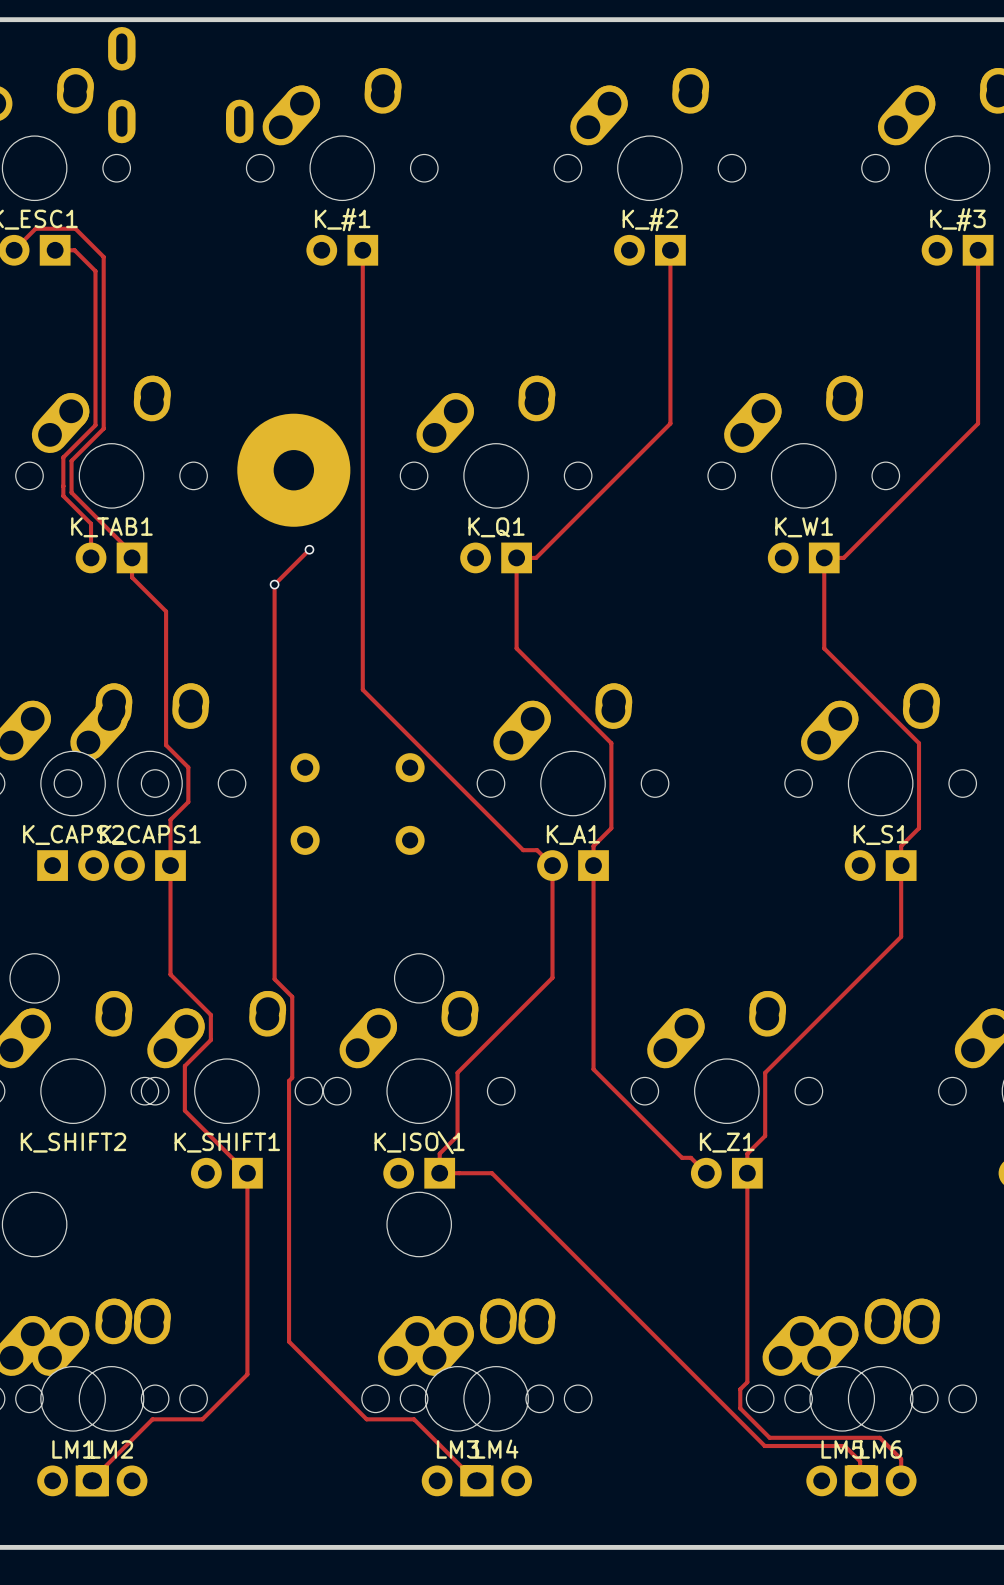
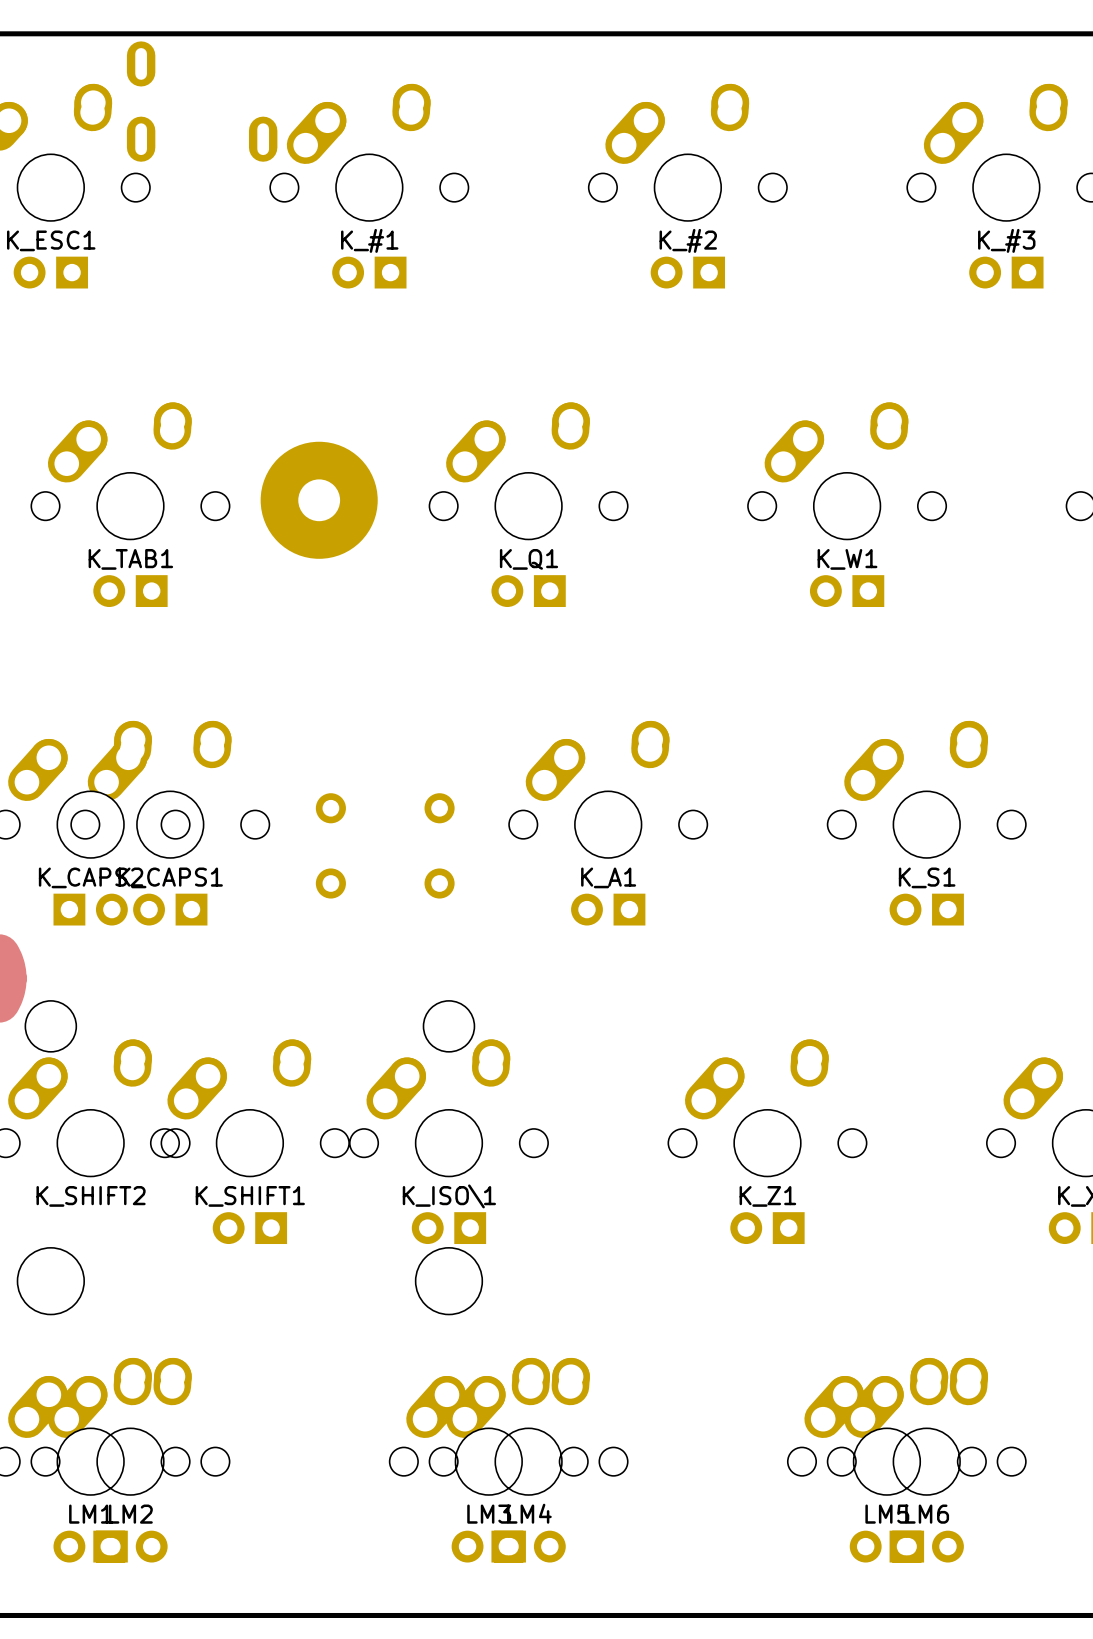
track: (14, 250) (35, 228) (75, 228) (103, 256) (103, 428) (71, 460) (71, 492) (132, 553) (132, 577) (166, 611) (166, 745) (188, 767) (188, 801) (170, 819) (170, 974) (210, 1014) (210, 1040) (184, 1066) (184, 1110) (247, 1173) (247, 1374) (202, 1419) (152, 1419) (91, 1480) -> none
track: (55, 250) (74, 250) (95, 271) (95, 425) (63, 457) (63, 496) (91, 523) (91, 557) -> none
track: (362, 250) (362, 689) (523, 850) (537, 850) (552, 865) (552, 977) (457, 1072) (457, 1135) (439, 1153) (439, 1173) (492, 1173) (764, 1446) (844, 1446) (860, 1461) (860, 1480) -> none
track: (670, 250) (670, 423) (536, 557) (516, 557) (516, 648) (611, 743) (611, 828) (593, 846) (593, 1069) (682, 1157) (690, 1157) (706, 1173) -> none
track: (978, 250) (978, 423) (843, 557) (824, 557) (824, 648) (919, 743) (919, 828) (901, 846) (901, 936) (765, 1072) (765, 1135) (747, 1153) (747, 1382) (740, 1389) (740, 1408) (769, 1437) (879, 1437) (901, 1459) (901, 1480) -> none
track: (309, 549) (274, 584) (274, 979) (292, 996) (292, 1077) (289, 1080) (289, 1341) (366, 1419) (414, 1419) (475, 1480) -> none
via: (309, 549) -> none
via: (274, 584) -> none

